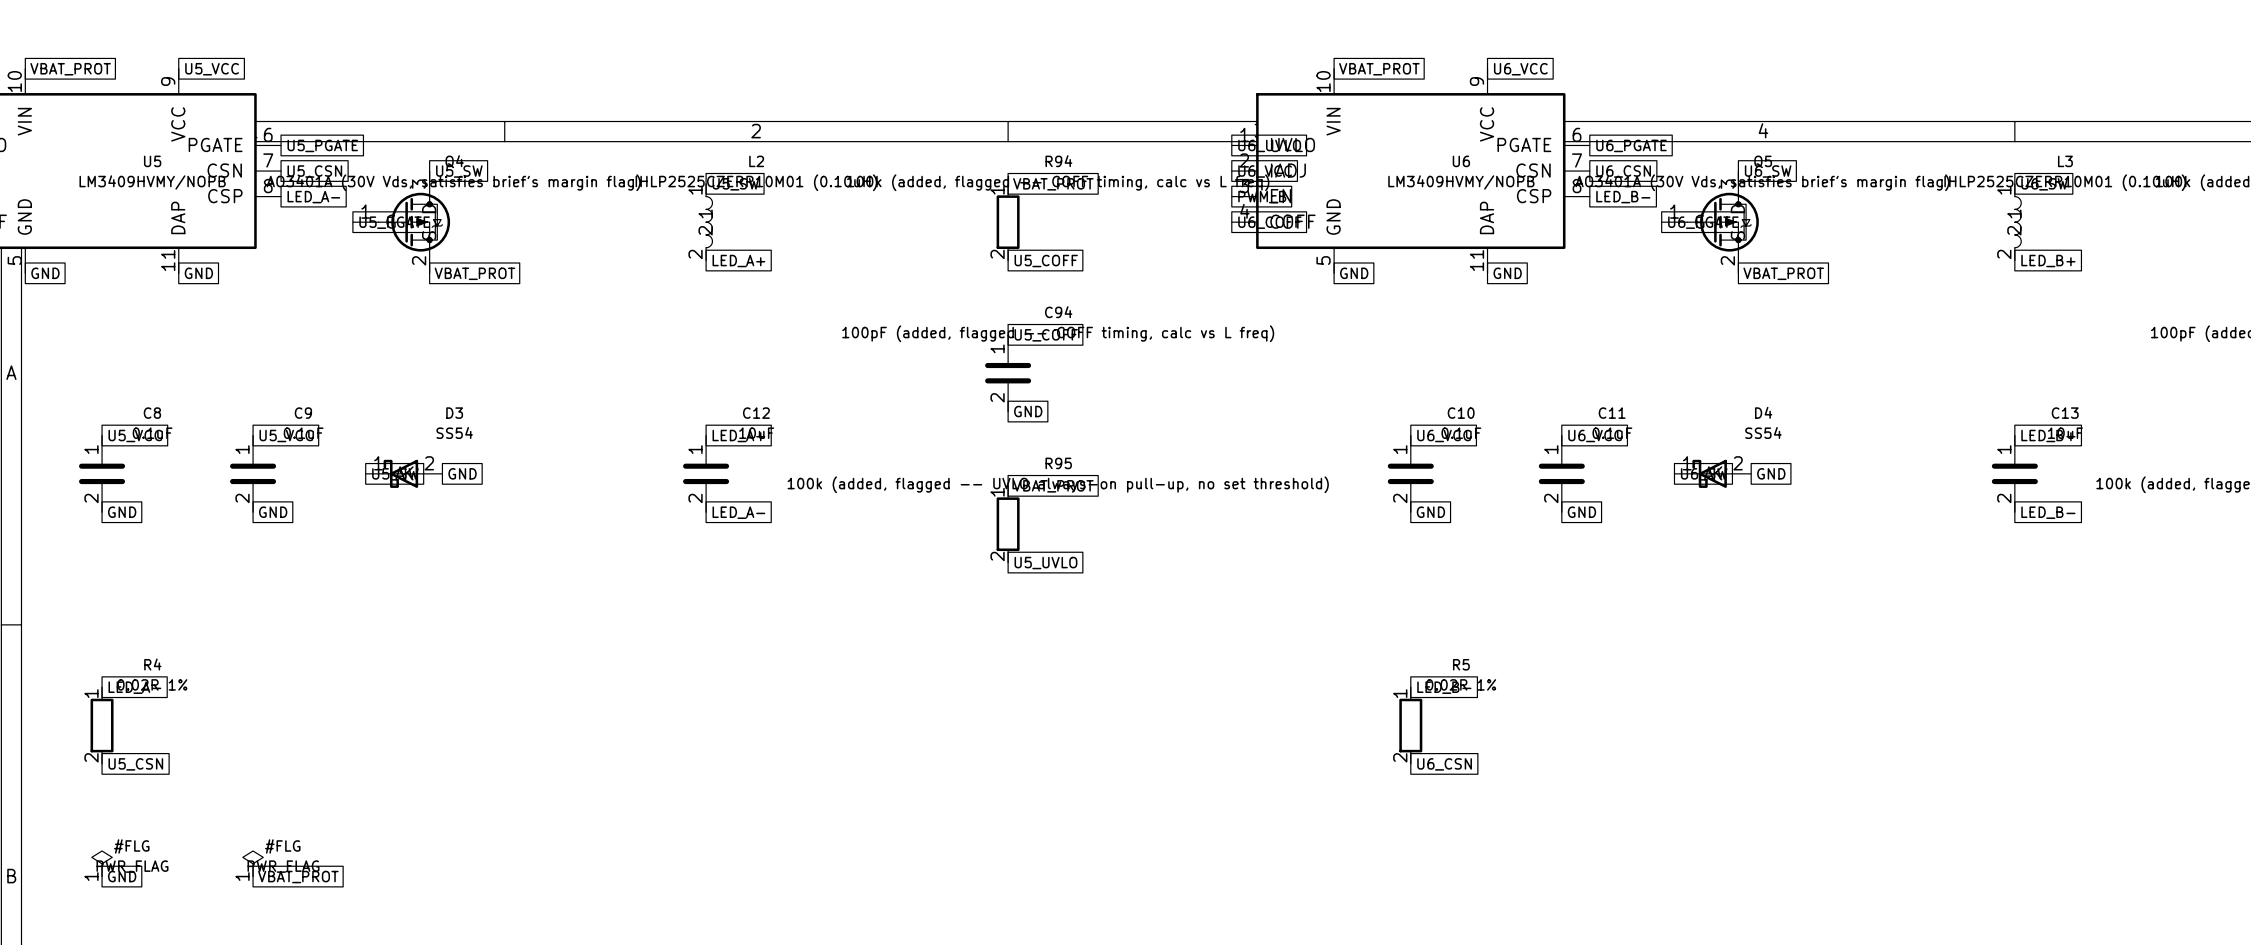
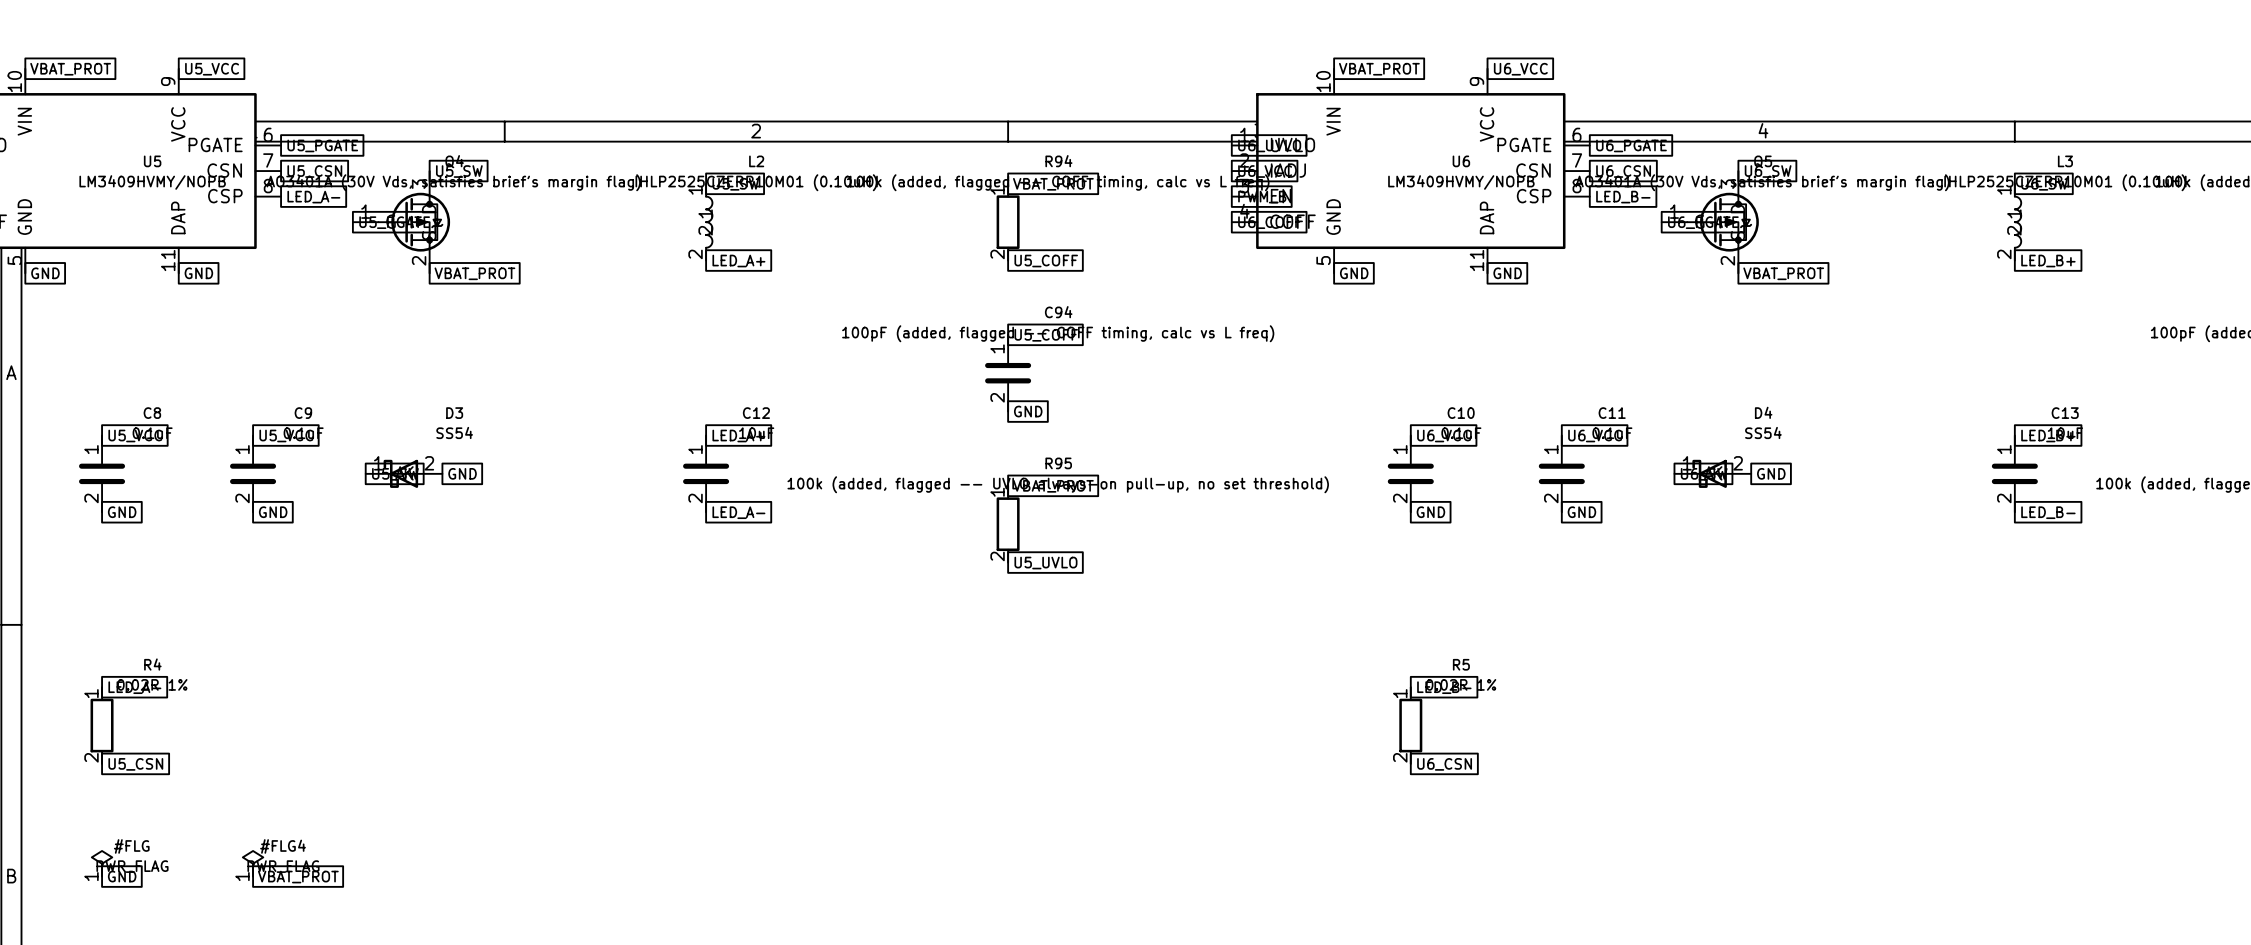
#FLG name: #FLG (282, 846) -> #FLG4 (283, 846)

